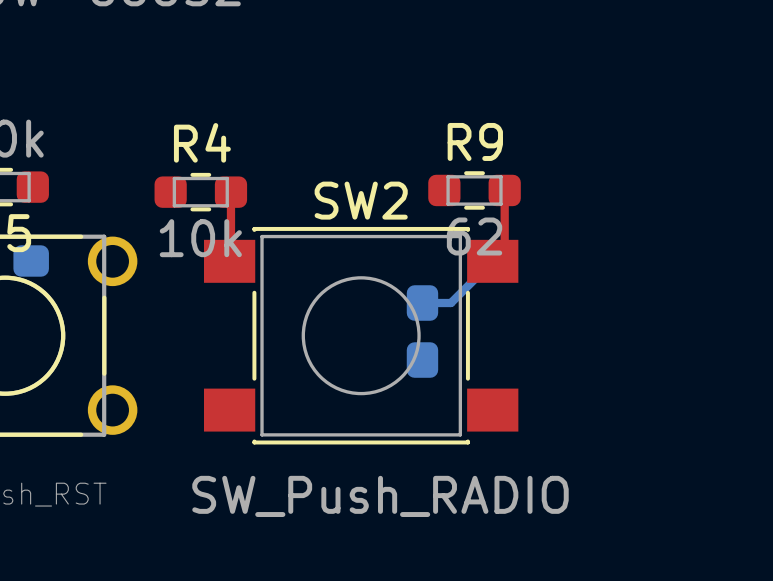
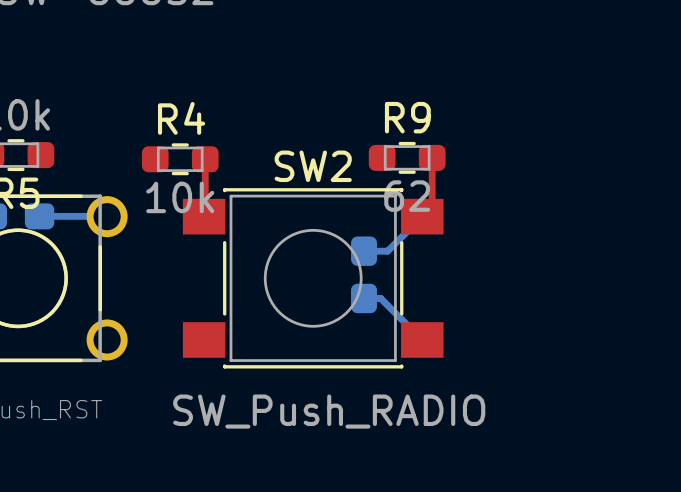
bottom track: none -> (39, 216) (106, 216)
bottom track: none -> (364, 298) (380, 298) (422, 340)

